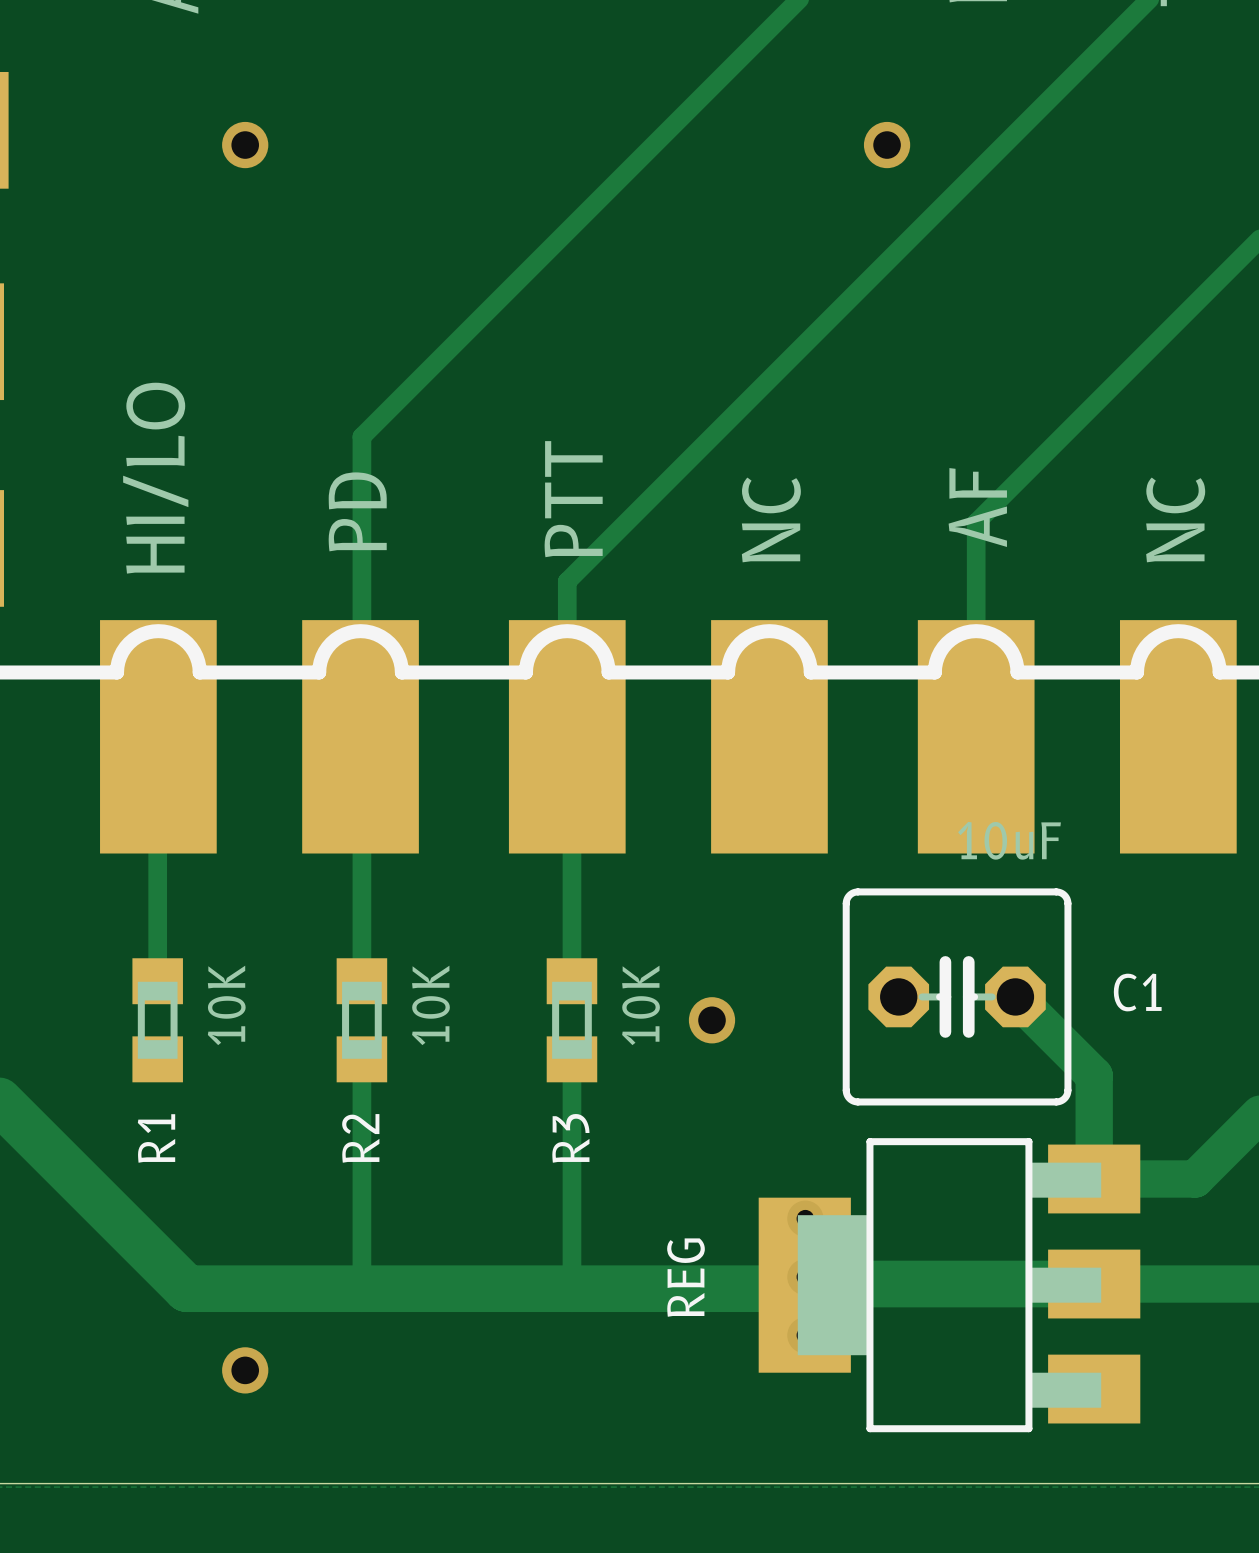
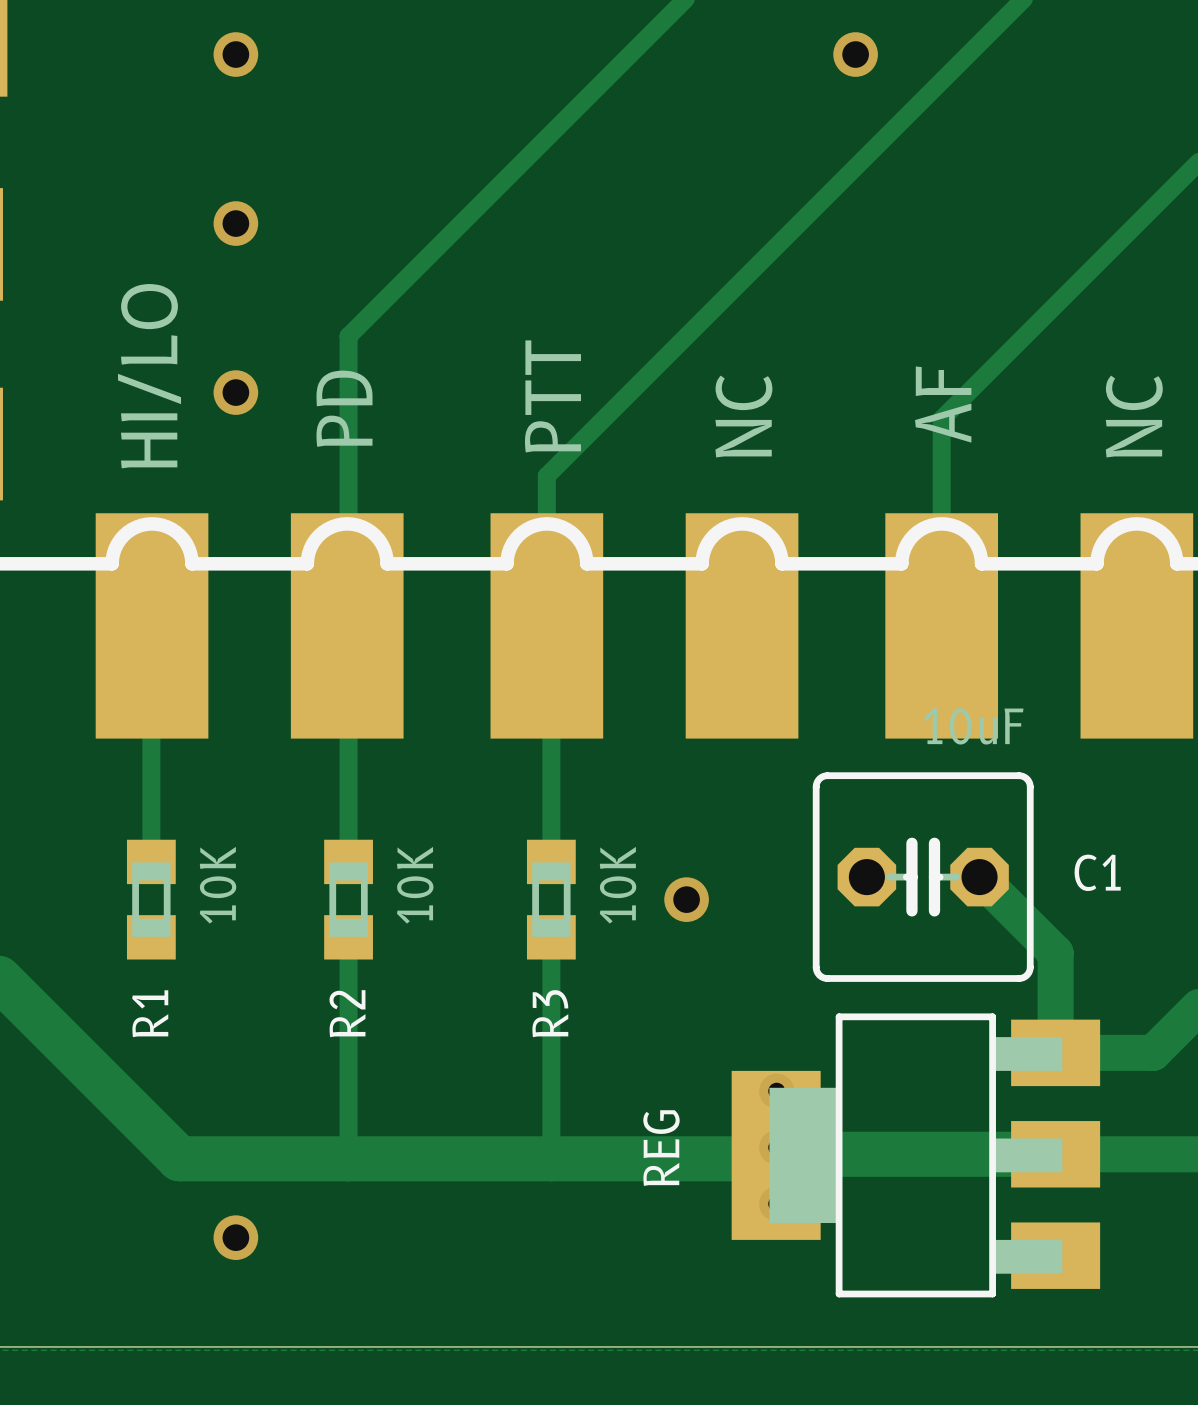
via: none -> (235, 223)
via: none -> (235, 392)

